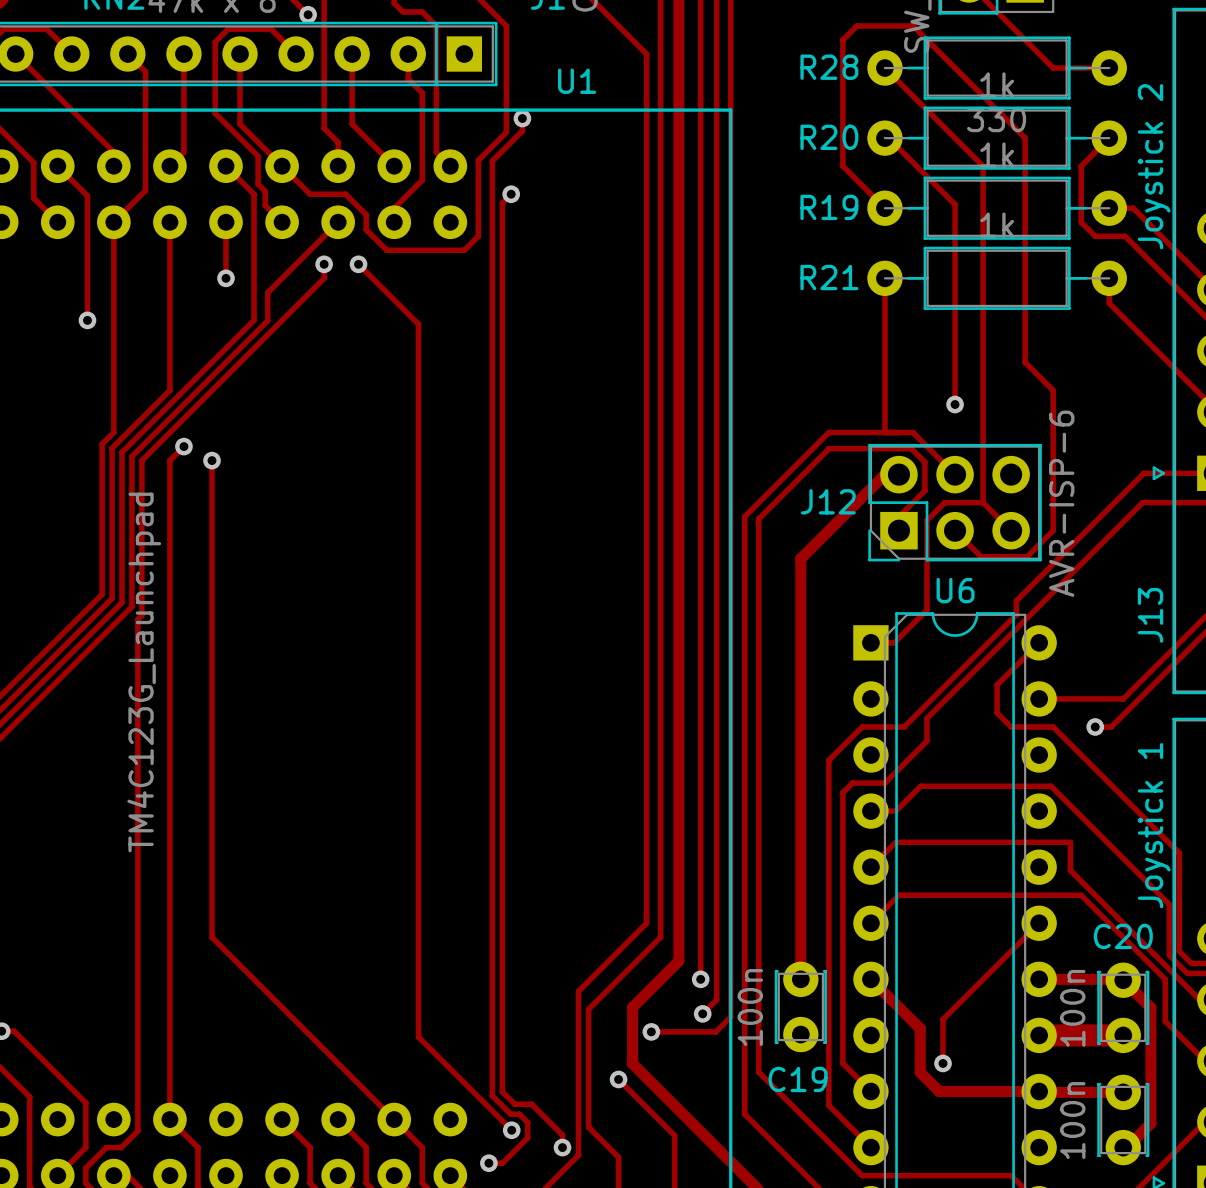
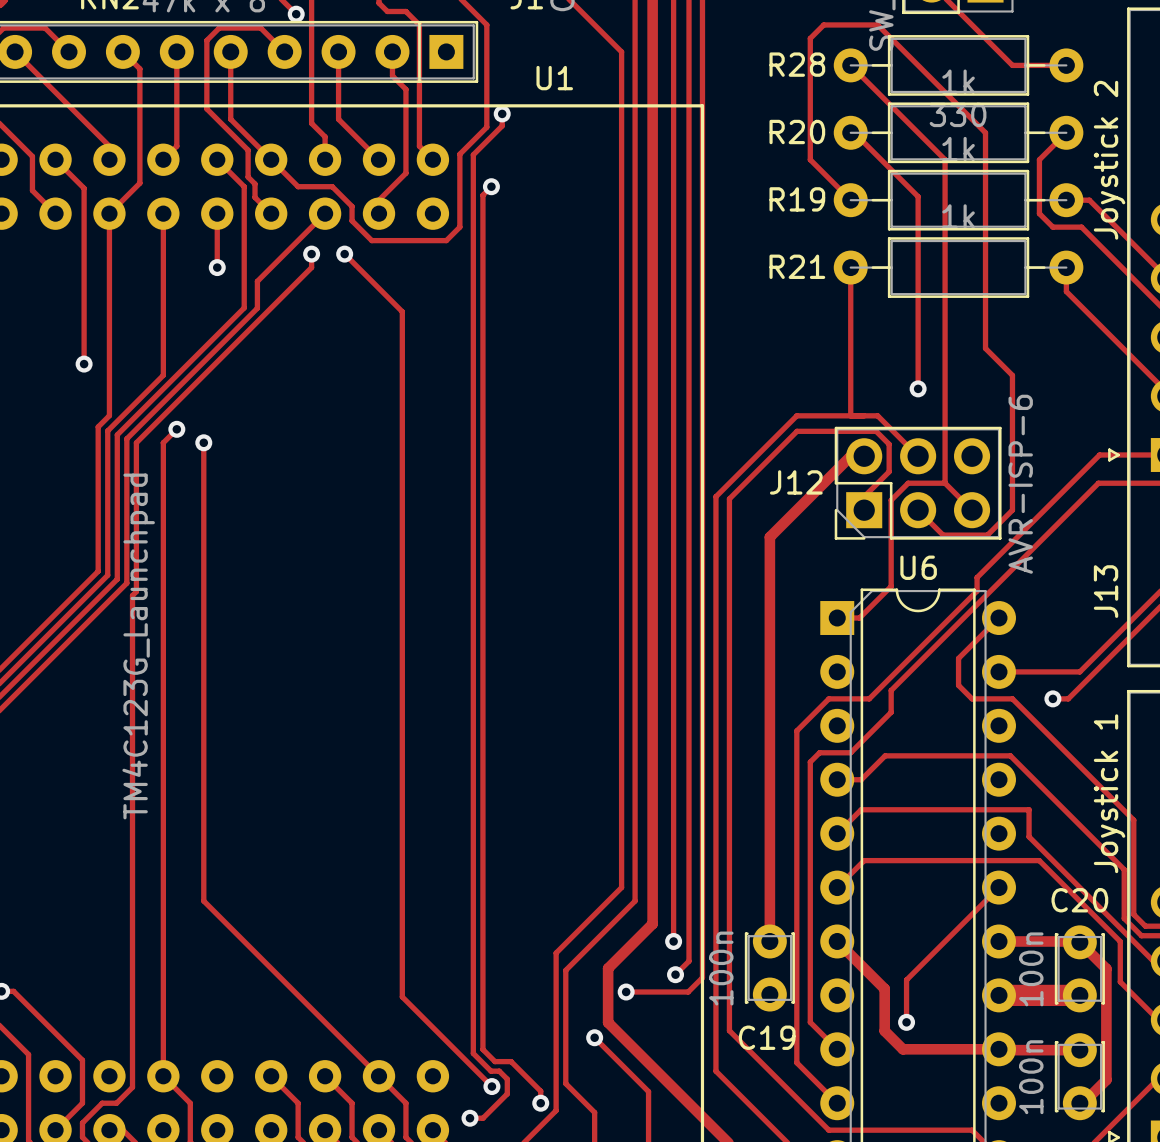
track: none -> (84, 308) (84, 364)
via position: (87, 320) -> (84, 364)

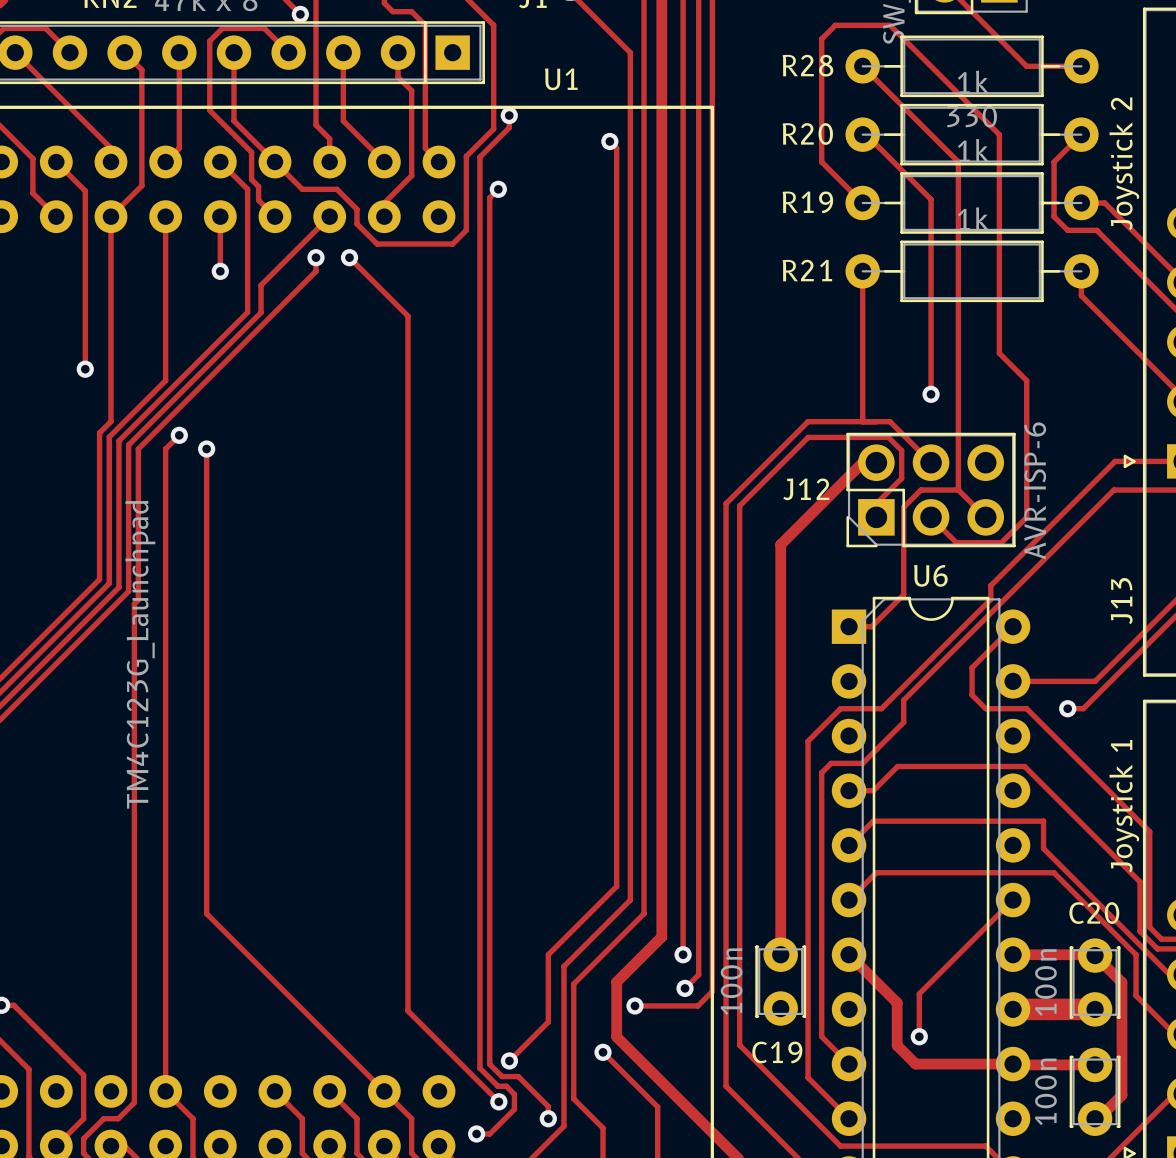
track: none -> (609, 141) (616, 148) (616, 886) (548, 954) (548, 1022) (509, 1060)
via: none -> (609, 141)
via: none -> (509, 1060)

